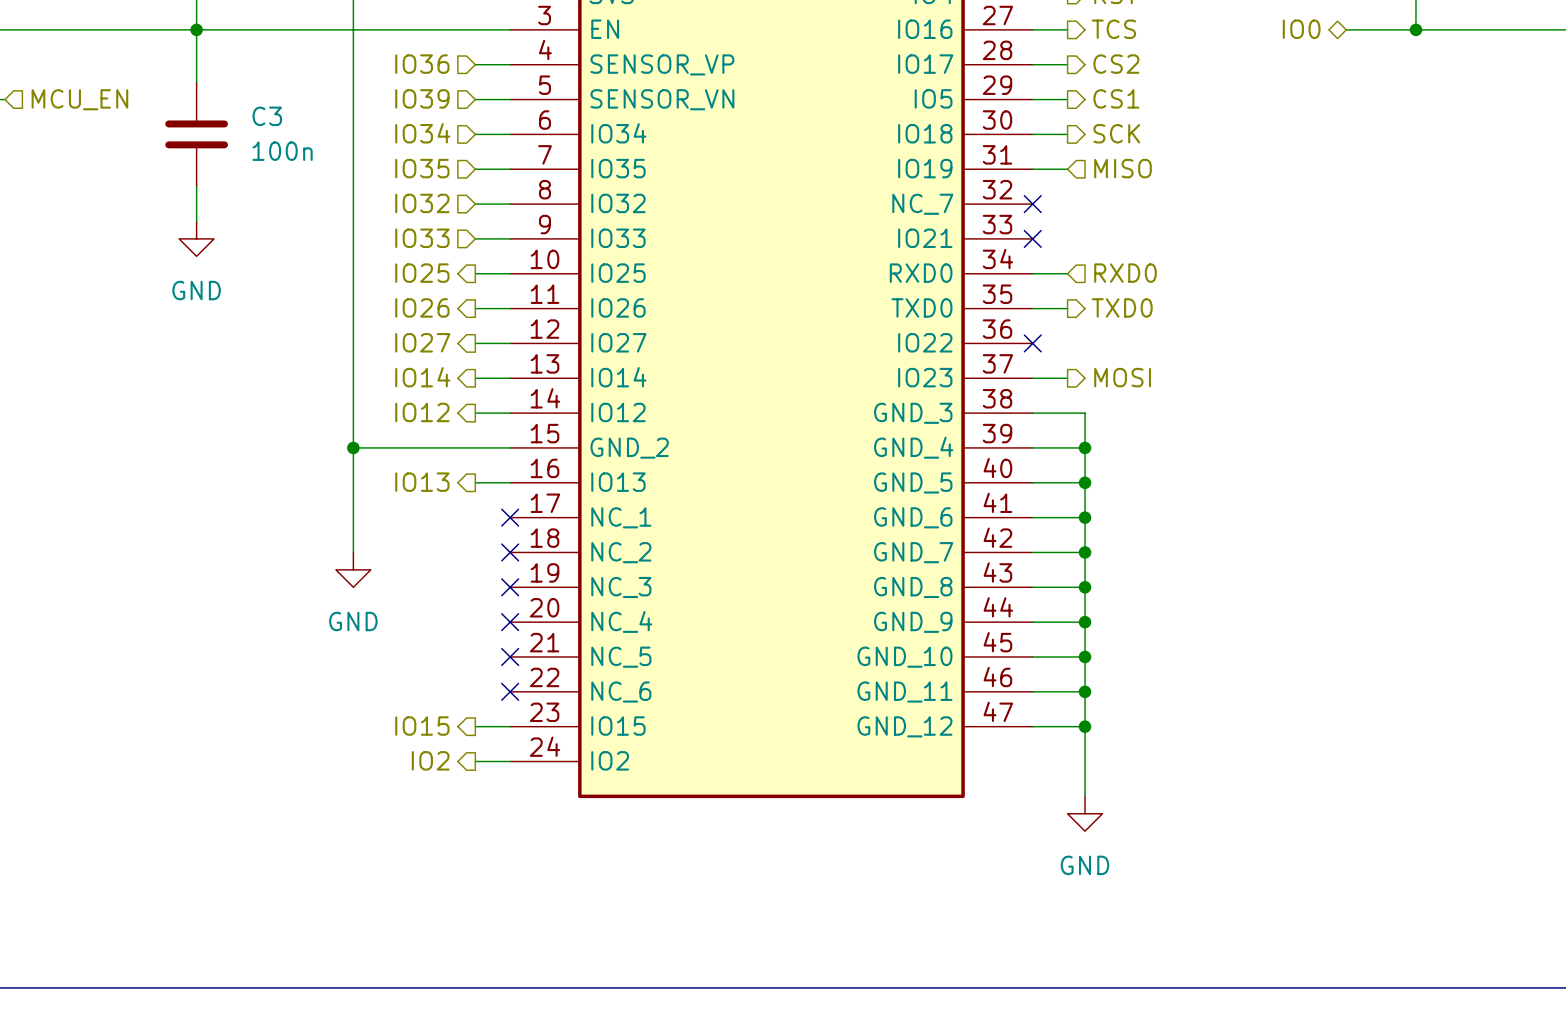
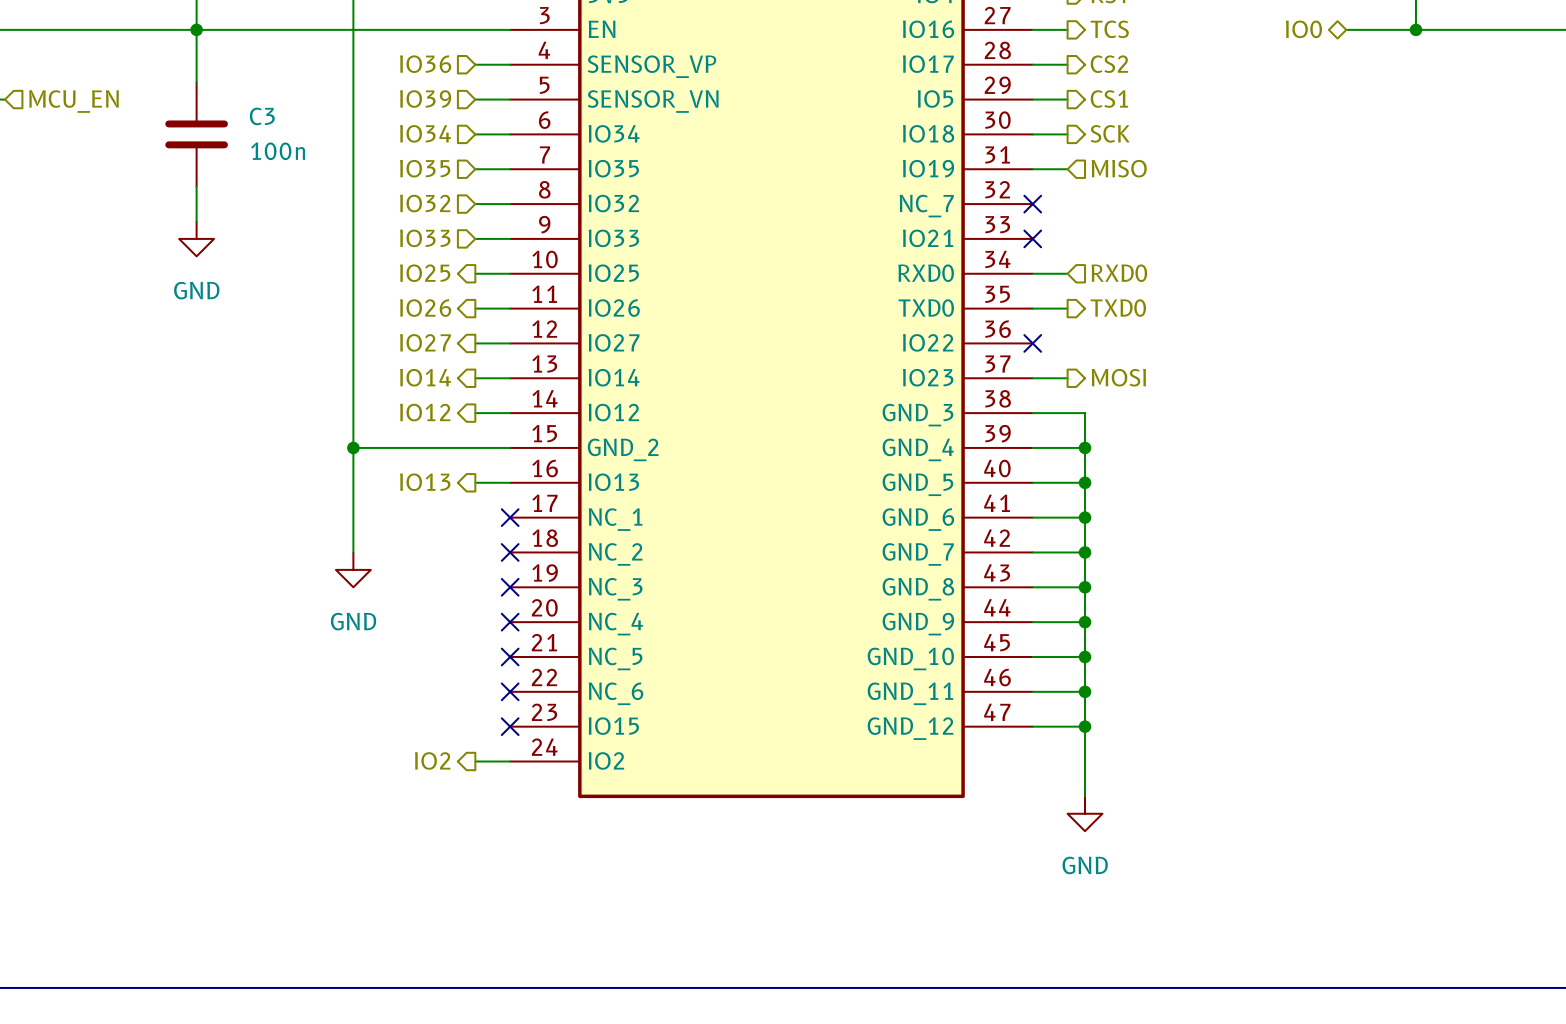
hierarchical label: IO15 (422, 726) -> none
wire: (475, 726) (510, 726) -> none
no-connect mark: none -> (510, 726)

